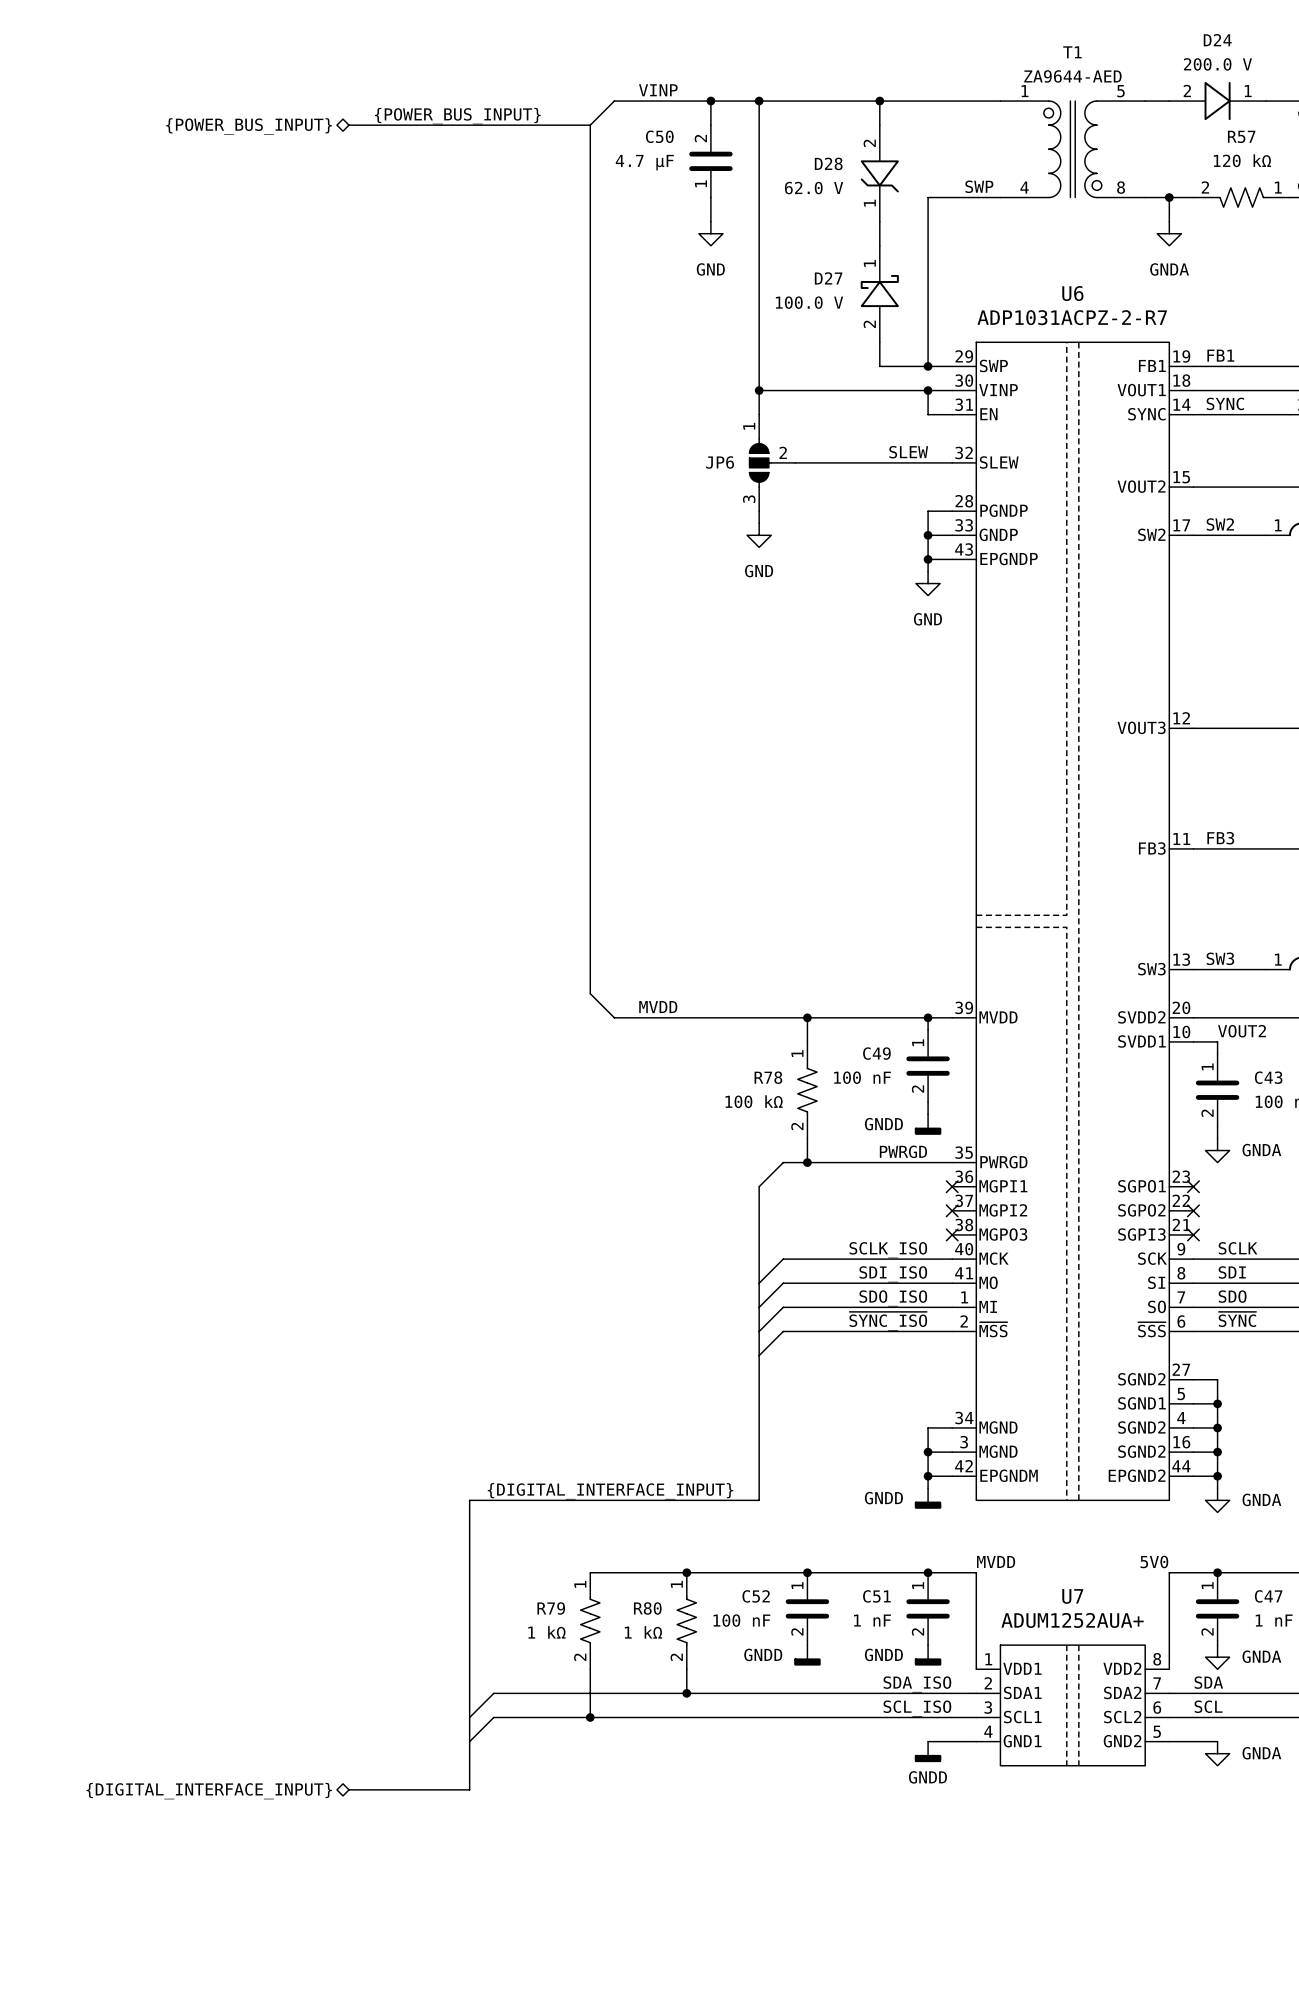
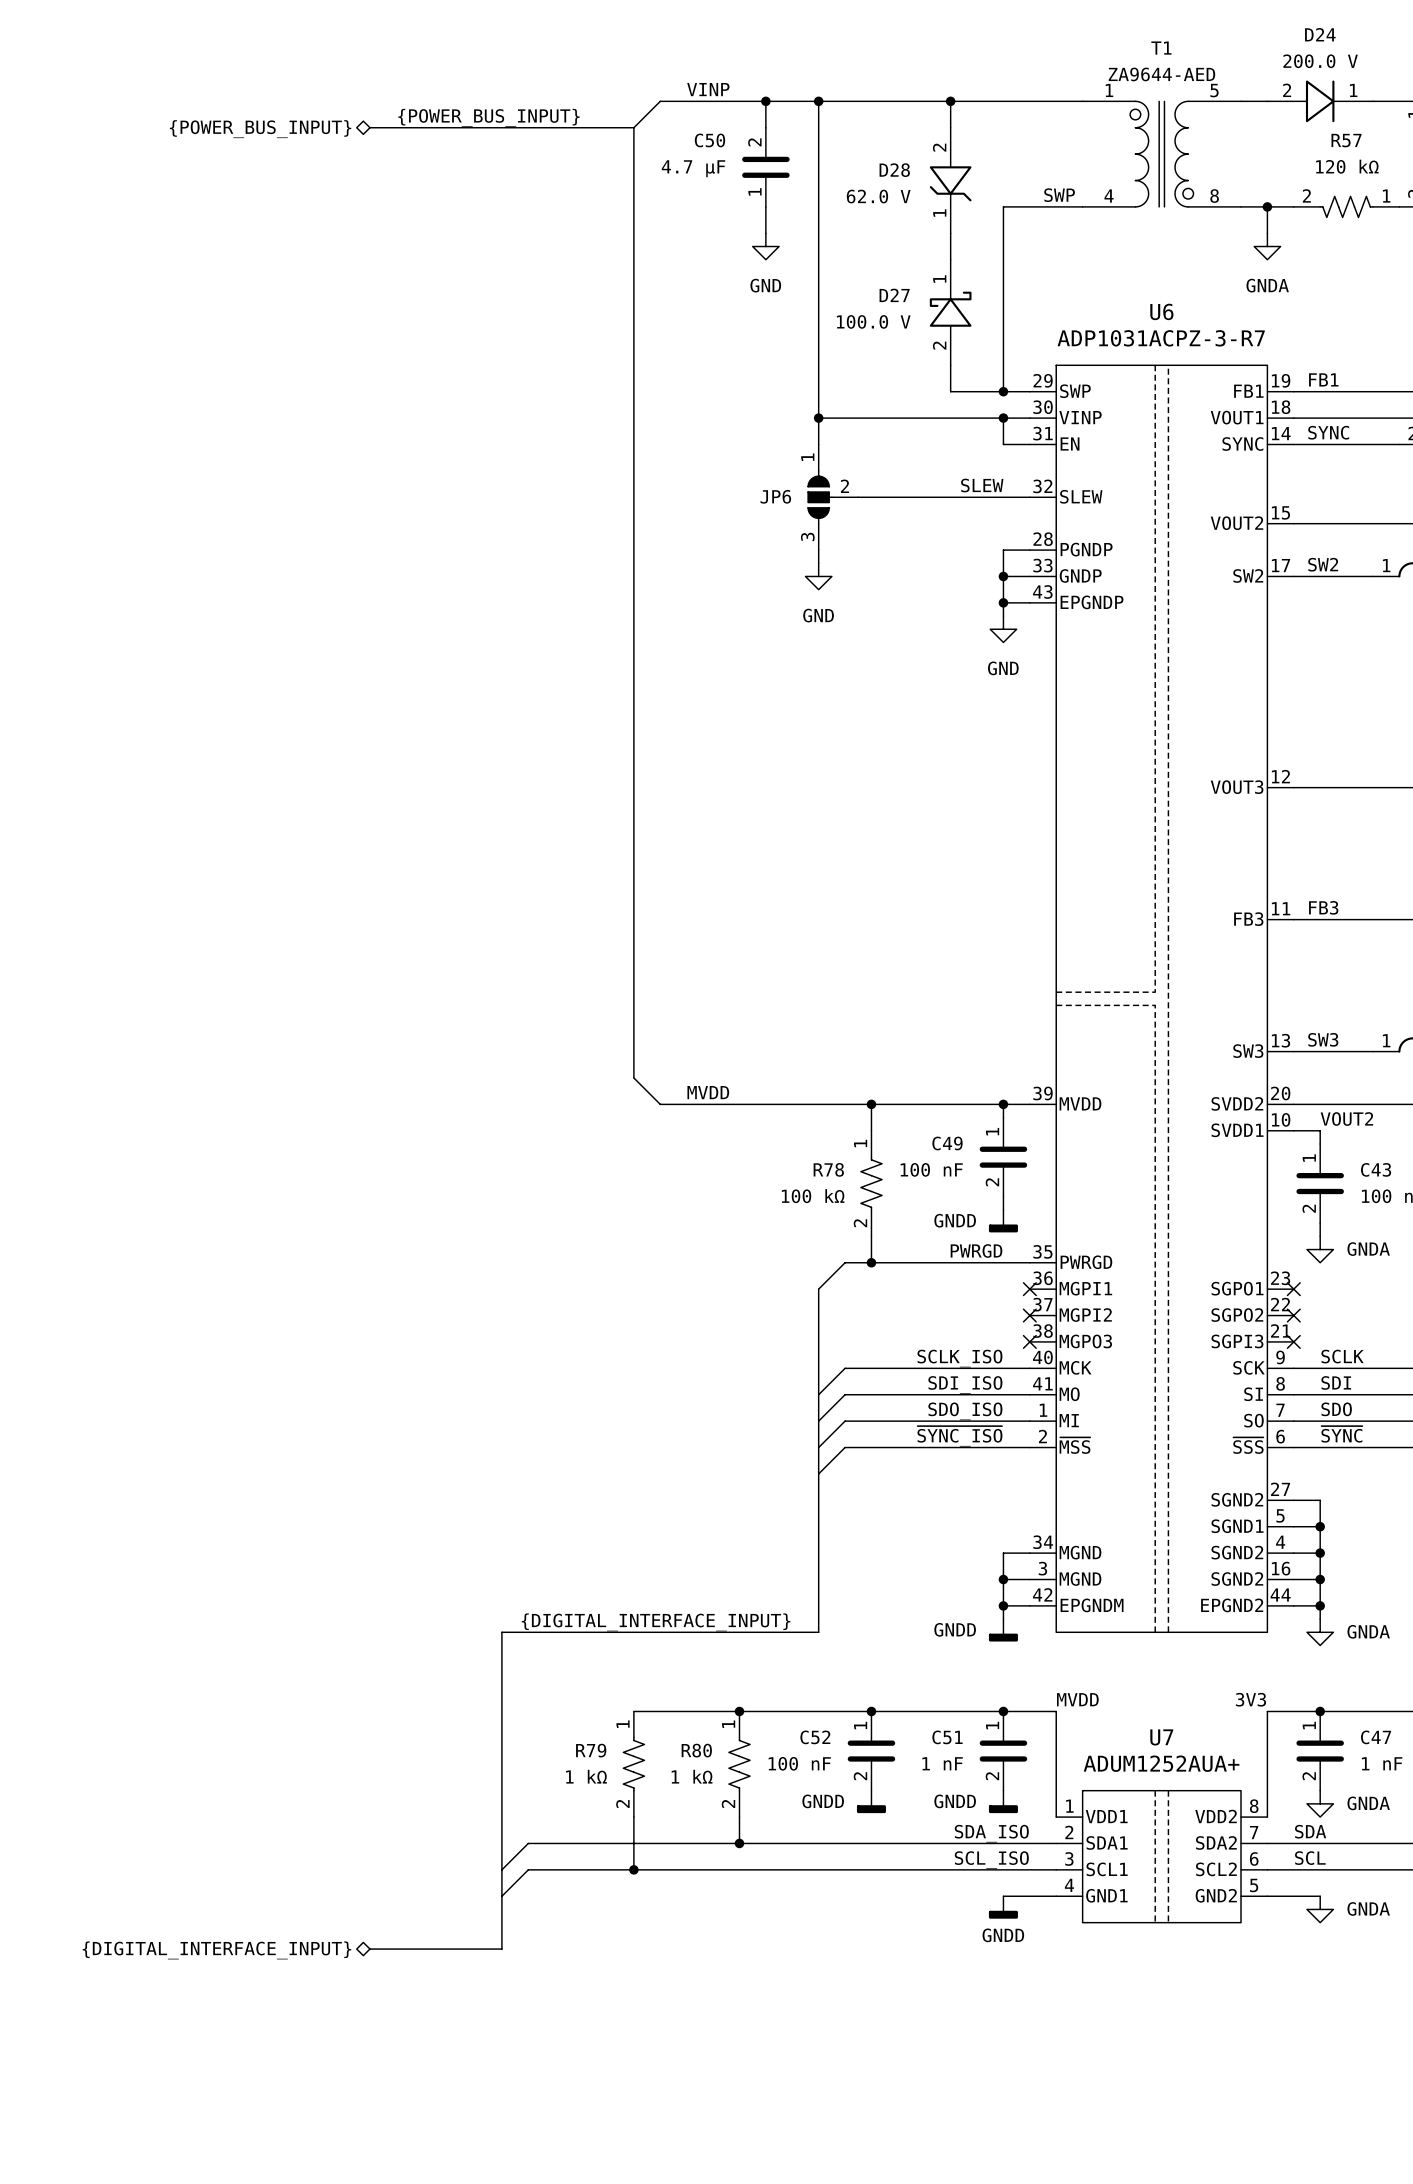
U6 value: ADP1031ACPZ-2-R7 (1072, 317) -> ADP1031ACPZ-3-R7 (1161, 338)
label: 5V0 (1154, 1561) -> 3V3 (1250, 1699)

